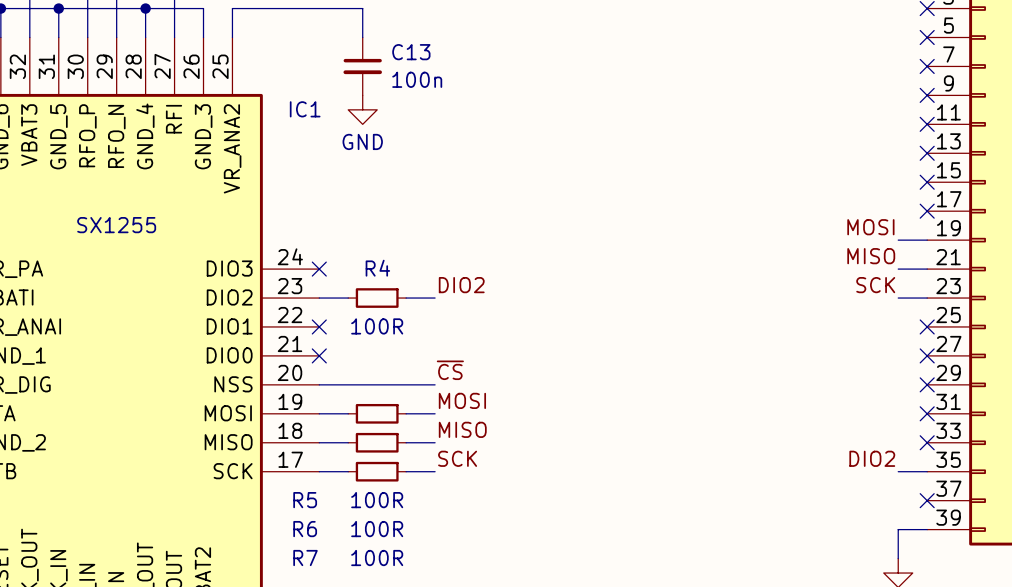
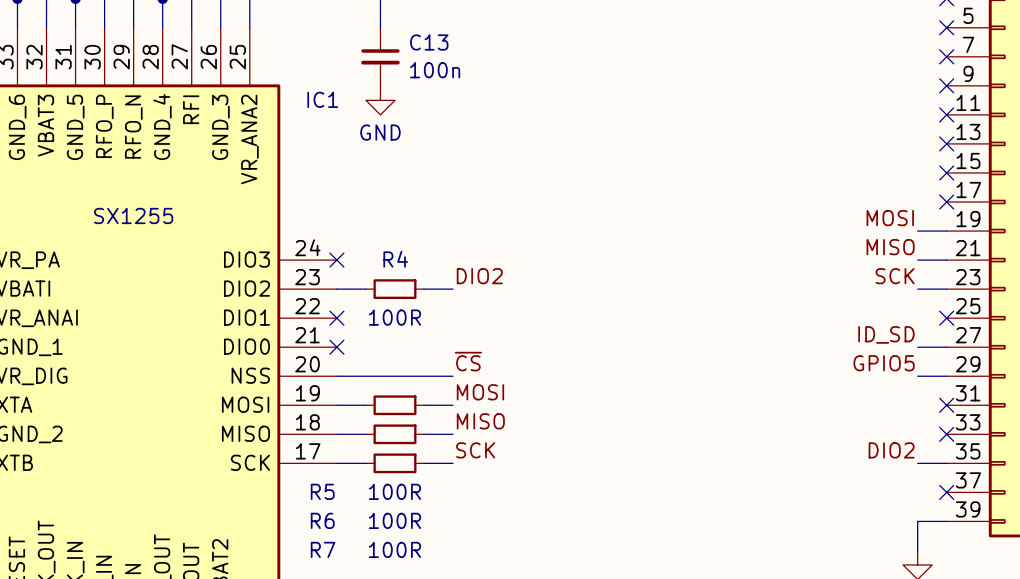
label: none -> ID_SD (886, 334)
wire: none -> (917, 347) (946, 347)
no-connect mark: (927, 355) -> none
label: none -> GPIO5 (884, 363)
wire: none -> (917, 376) (946, 376)
no-connect mark: (927, 384) -> none

